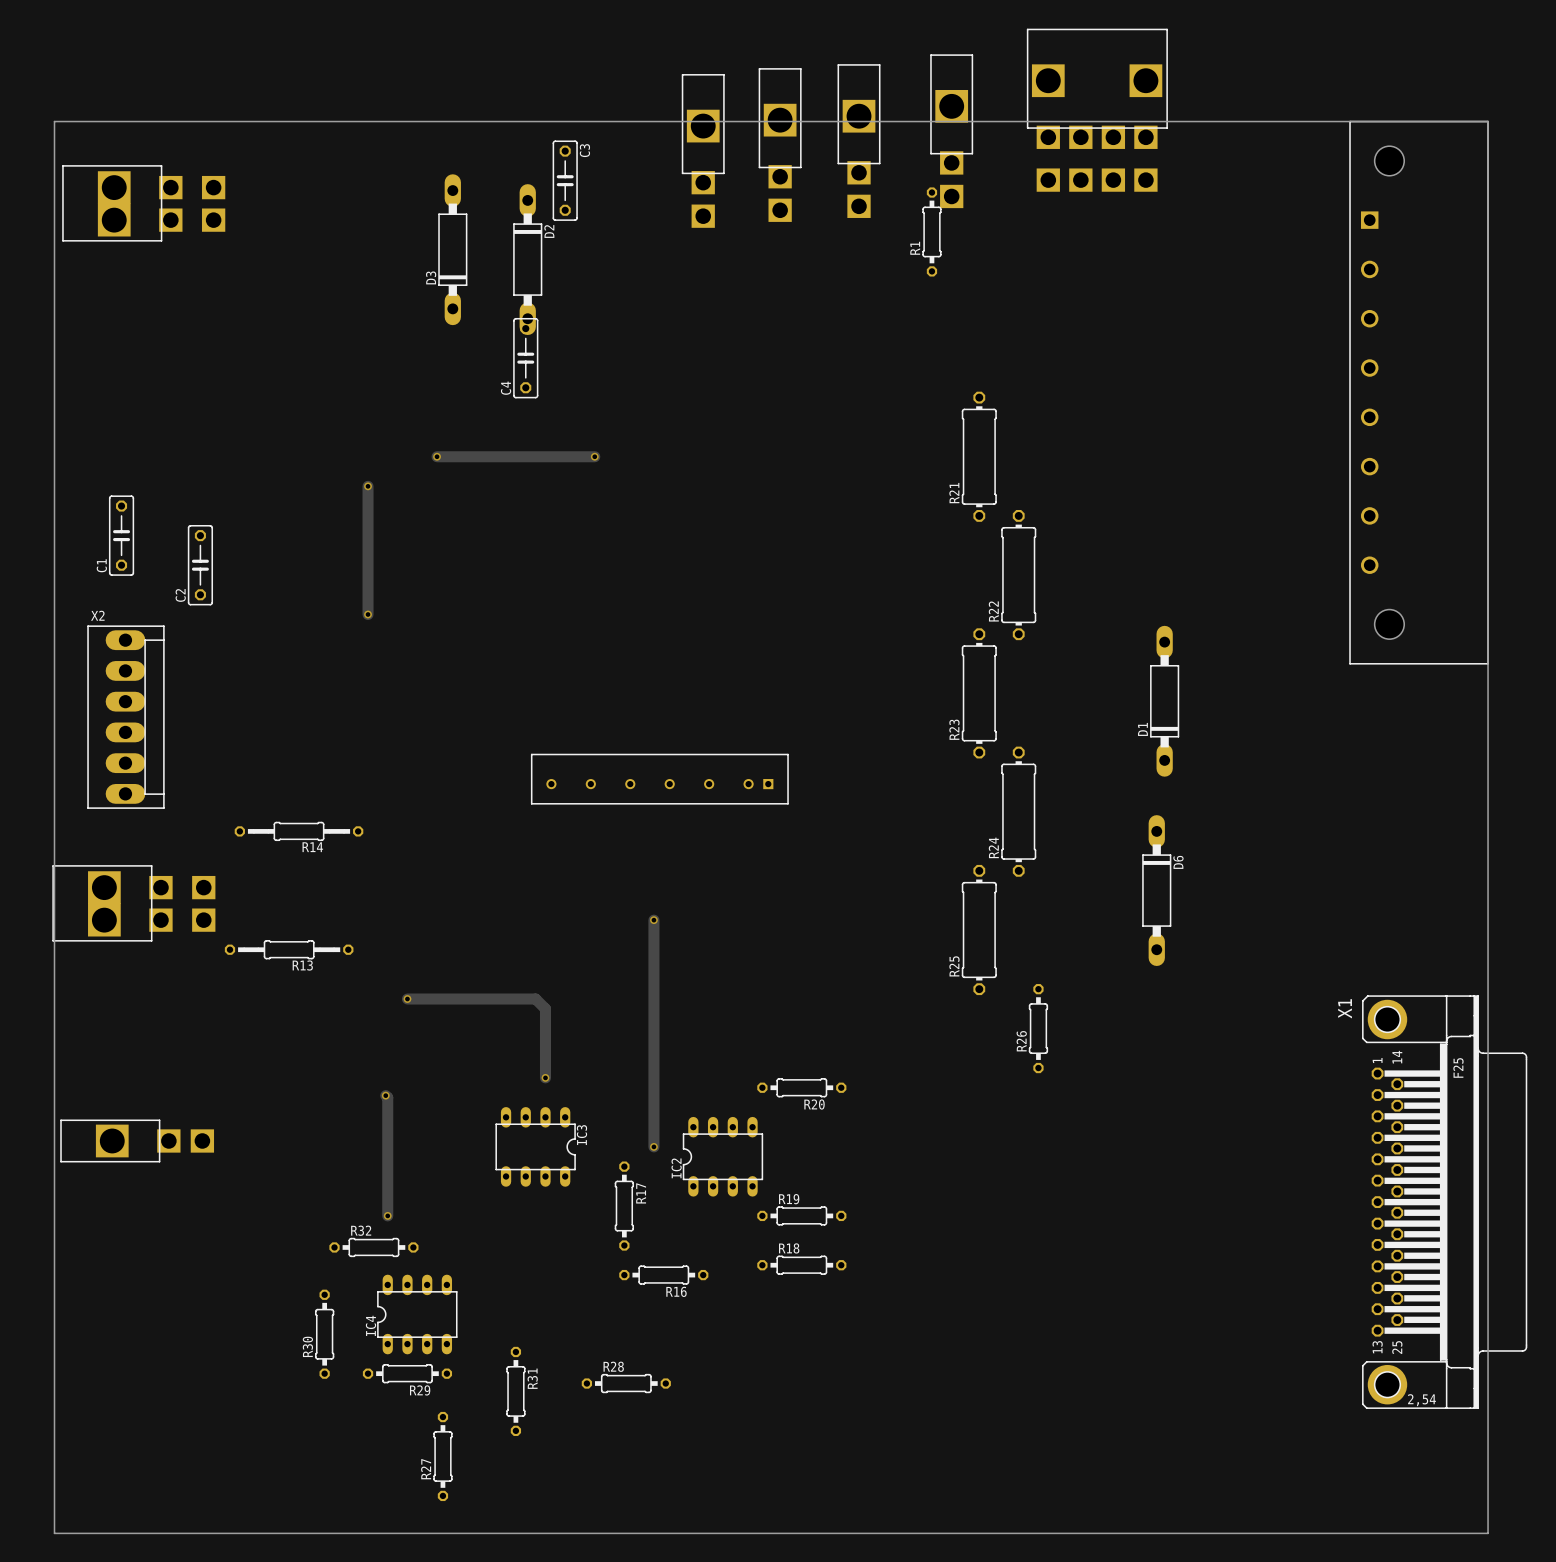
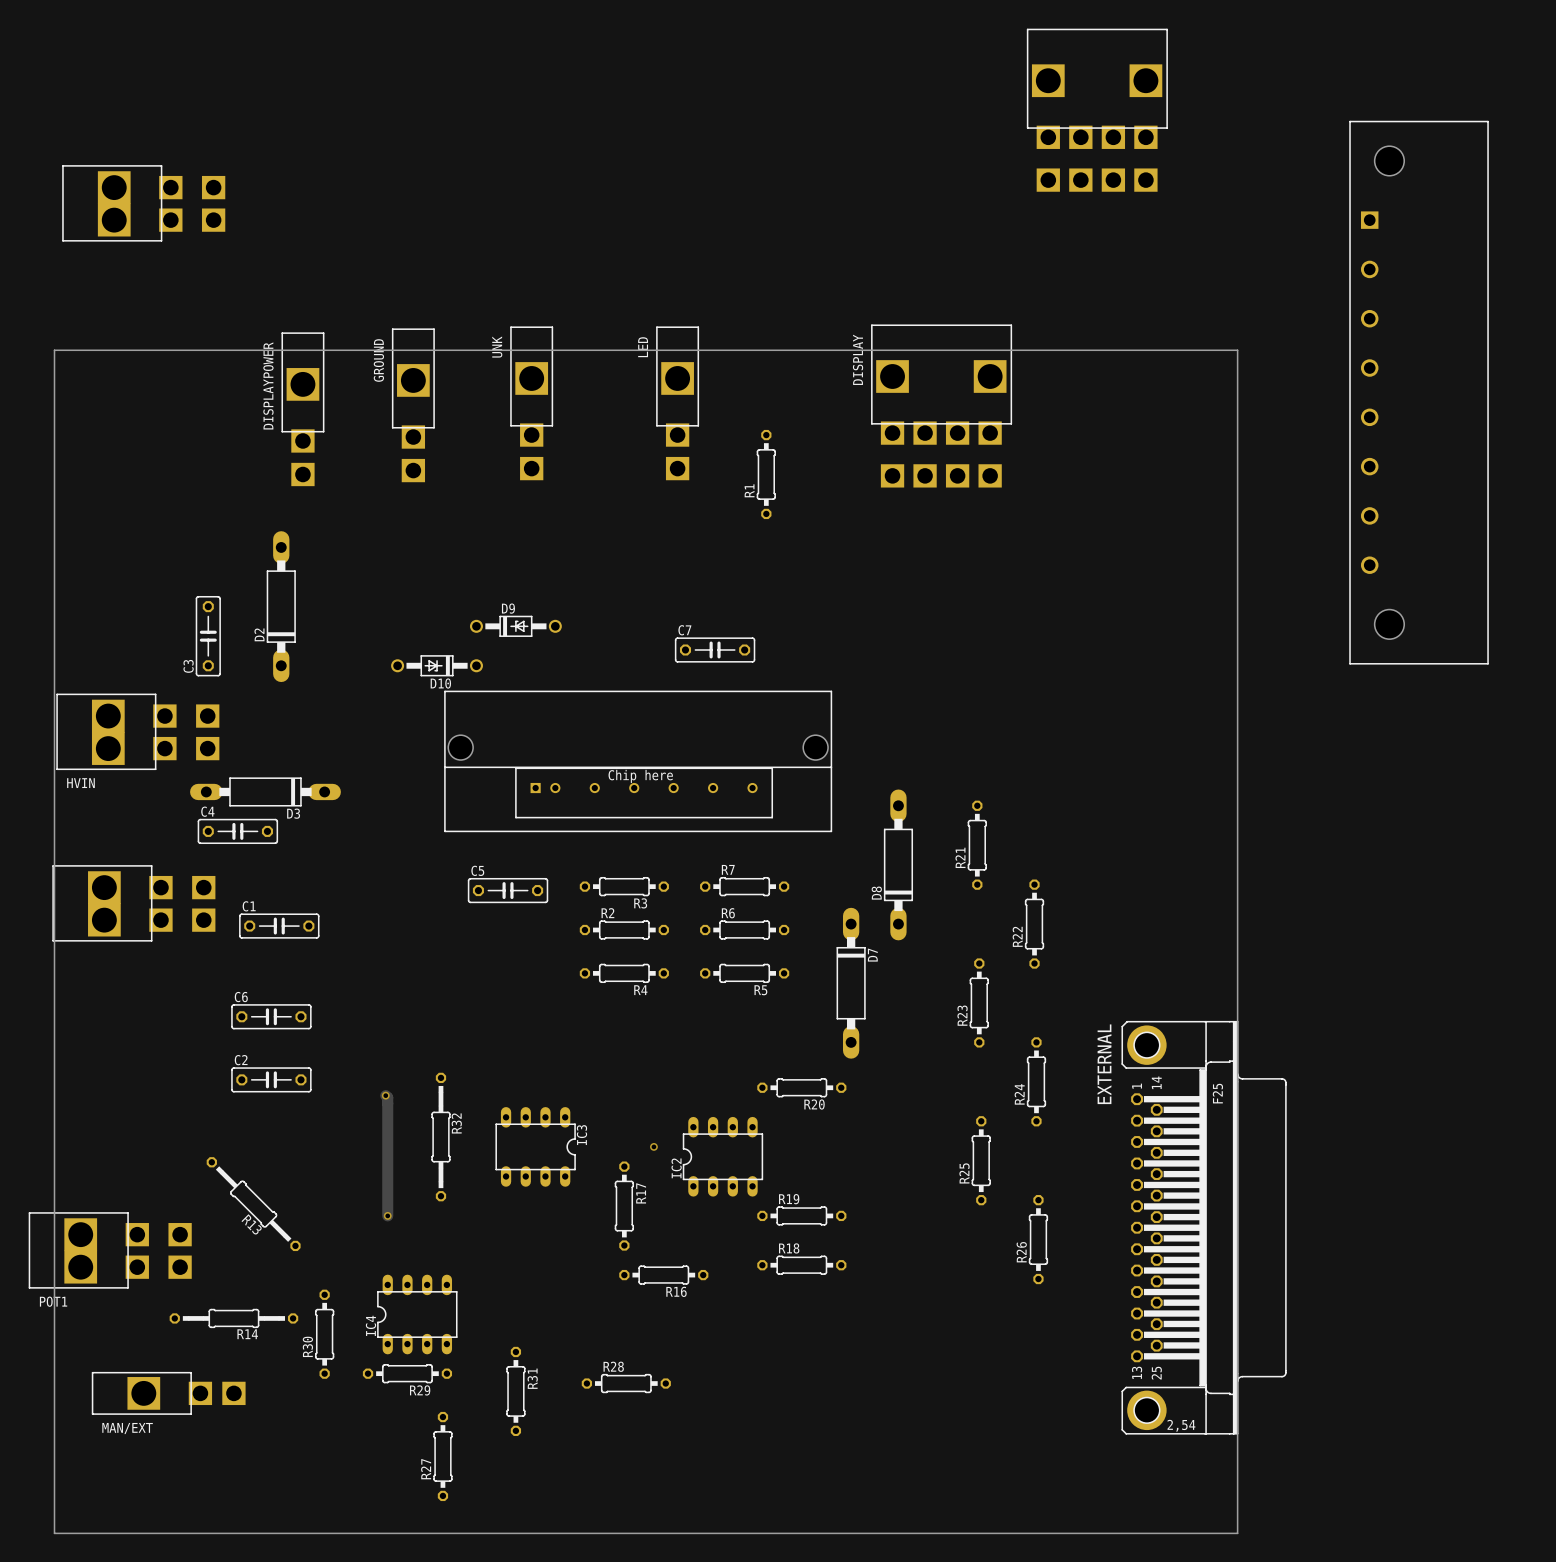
part: (951, 131) -> none
part: (859, 141) -> none
part: (780, 145) -> none
C3 name position: C3 (584, 150) -> C3 (188, 666)
part: (703, 151) -> none
C3 position: (565, 180) -> (208, 636)
R1 position: (931, 231) -> (766, 474)
D3 rotation: 0° (452, 249) -> 90° counterclockwise (265, 791)
D3 position: (452, 249) -> (265, 791)
D2 rotation: 0° (527, 259) -> 180° (281, 606)
D2 position: (527, 259) -> (281, 606)
board edge: (54, 350) (54, 121) (1488, 121) (1488, 1533) (1237, 1533) -> (54, 350) (1237, 350) (1237, 1533)
C4 rotation: 0° (525, 358) -> 90° clockwise (237, 831)
C4 position: (525, 358) -> (237, 831)
R21 footprint: [961, 391, 997, 522] -> [967, 800, 987, 890]
UNK: none -> (531, 403)
LED: none -> (677, 403)
GROUND: none -> (413, 405)
DISPLAY: none -> (941, 406)
DISPLAYPOWER: none -> (302, 409)
track: (437, 456) (594, 456) -> none
via: (437, 456) -> none
via: (594, 456) -> none
track: (368, 486) (368, 614) -> none
via: (368, 486) -> none
R21 name position: R21 (954, 493) -> R21 (960, 857)
R22 footprint: [1001, 509, 1037, 641] -> [1025, 879, 1044, 969]
C1 rotation: 0° (121, 535) -> 90° clockwise (279, 926)
C1 position: (121, 535) -> (279, 926)
C2 rotation: 0° (200, 565) -> 90° clockwise (271, 1079)
C2 position: (200, 565) -> (271, 1079)
R22 name position: R22 (993, 611) -> R22 (1017, 936)
via: (368, 614) -> none
D9: none -> (515, 626)
R23 footprint: [961, 628, 997, 759] -> [969, 958, 989, 1048]
C7: none -> (715, 650)
D10: none -> (437, 665)
D1: (1164, 701) -> none
X2: (125, 717) -> none
R23 name position: R23 (954, 729) -> R23 (962, 1015)
HVIN: none -> (137, 731)
R24 footprint: [1001, 746, 1037, 877] -> [1027, 1037, 1046, 1127]
part: none -> (638, 761)
part rotation: 0° (659, 779) -> 180° (644, 792)
R14 position: (299, 831) -> (233, 1318)
R24 name position: R24 (993, 847) -> R24 (1019, 1094)
D8: none -> (898, 864)
R25 footprint: [961, 864, 997, 996] -> [971, 1116, 991, 1206]
R3: none -> (624, 886)
R7: none -> (744, 886)
C5: none -> (508, 890)
D6: (1156, 890) -> none
track: (653, 920) (653, 1146) -> none
via: (653, 920) -> none
R2: none -> (624, 930)
R6: none -> (744, 930)
R13 rotation: 0° (289, 949) -> 45° clockwise (253, 1204)
R13 position: (289, 949) -> (253, 1204)
R25 name position: R25 (954, 966) -> R25 (964, 1173)
R4: none -> (624, 973)
R5: none -> (744, 973)
D7: none -> (851, 983)
track: (407, 999) (535, 999) (545, 1008) (545, 1077) -> none
via: (407, 999) -> none
C6: none -> (271, 1016)
R26 position: (1038, 1028) -> (1038, 1239)
via: (545, 1077) -> none
part: (137, 1140) -> none
X1: (1444, 1202) -> none
EXTERNAL: none -> (1204, 1227)
R32 name position: R32 (361, 1230) -> R32 (456, 1123)
R32 footprint: [329, 1238, 419, 1257] -> [431, 1072, 451, 1202]
POT1: none -> (110, 1250)
MAN/EXT: none -> (168, 1393)

